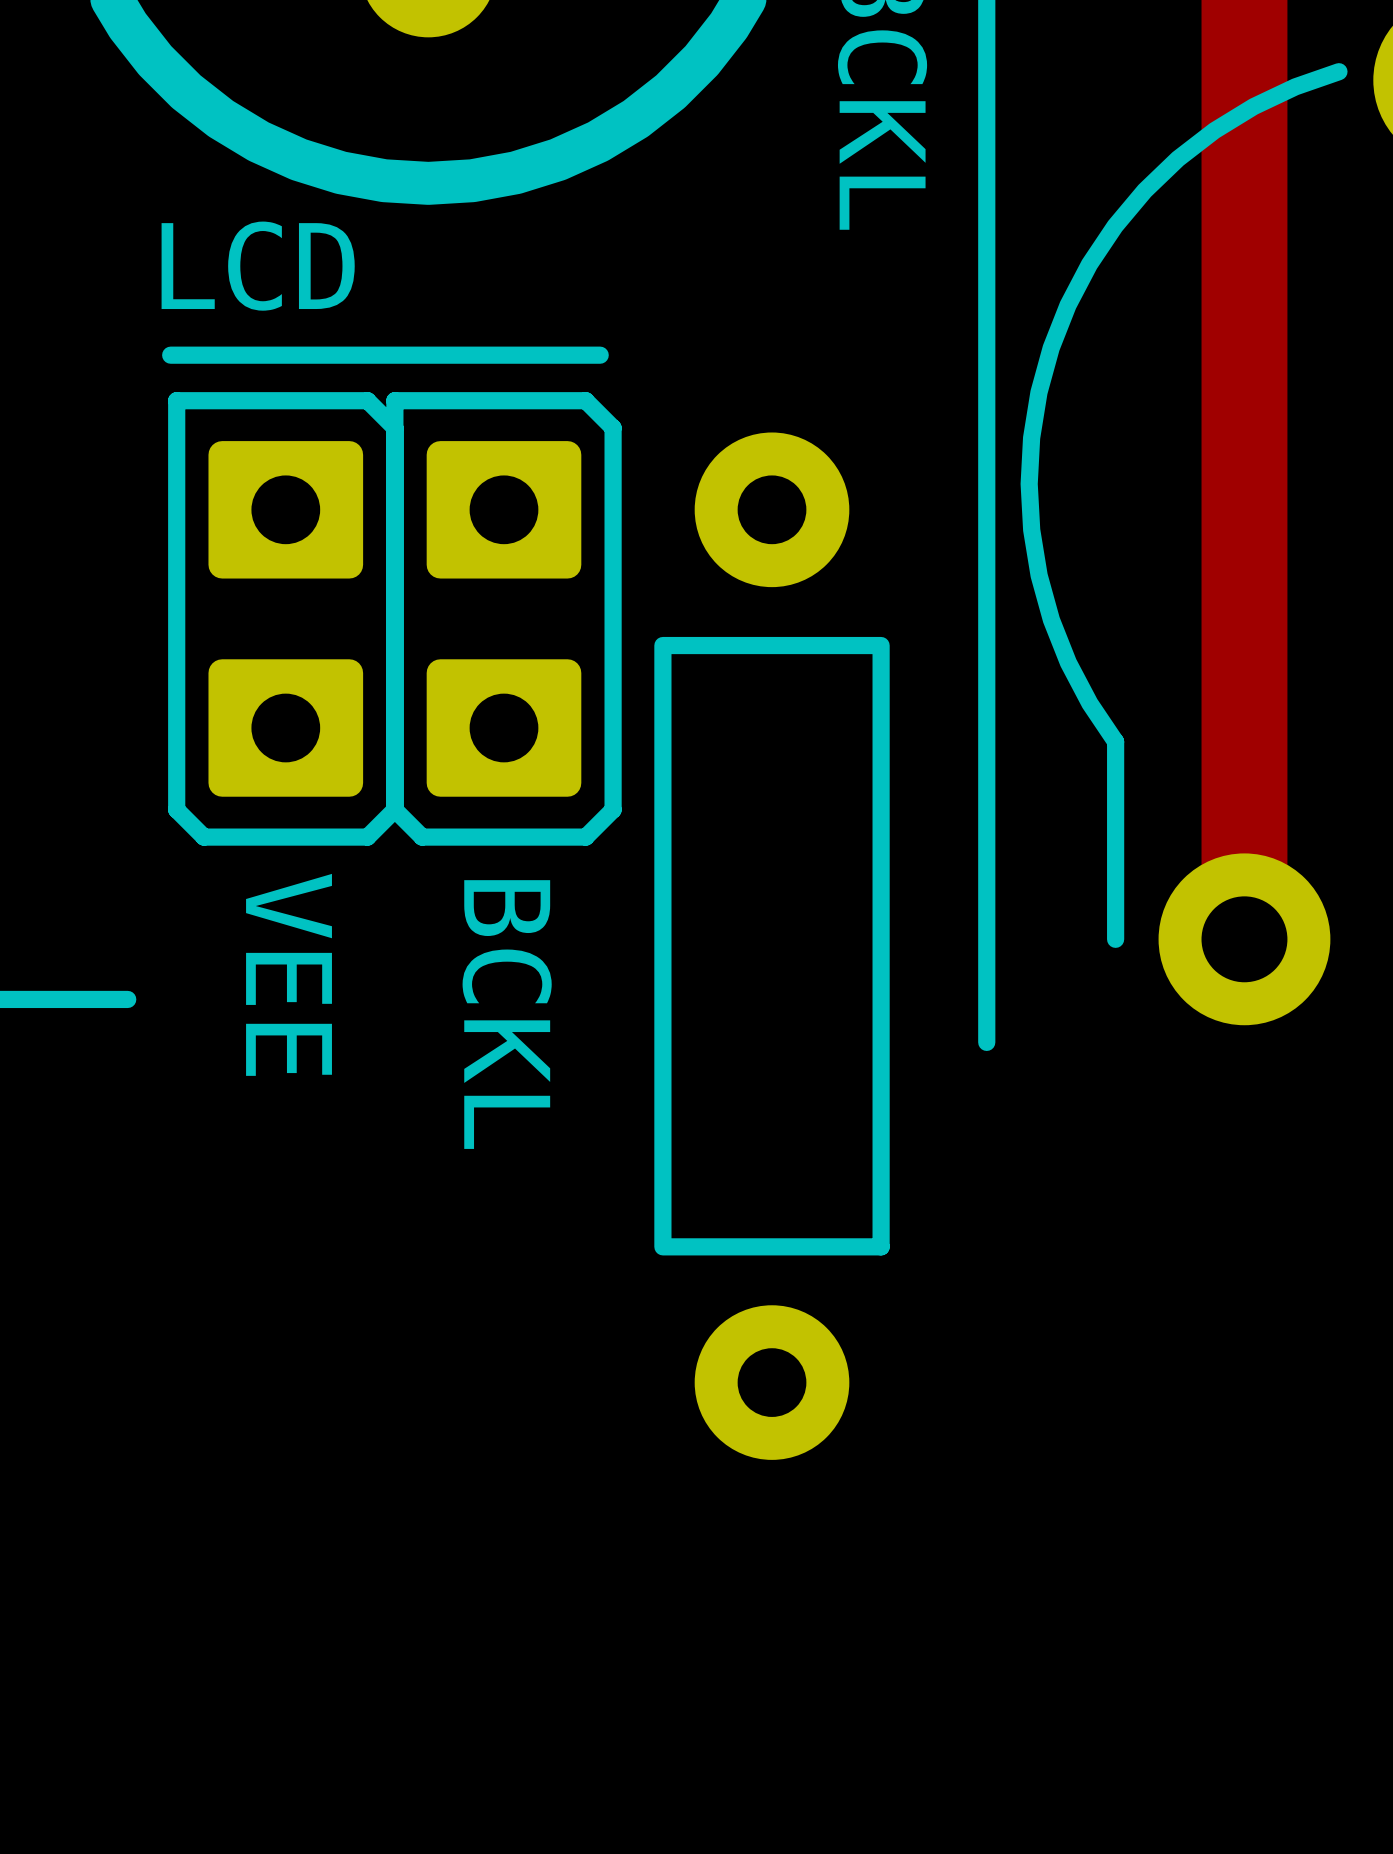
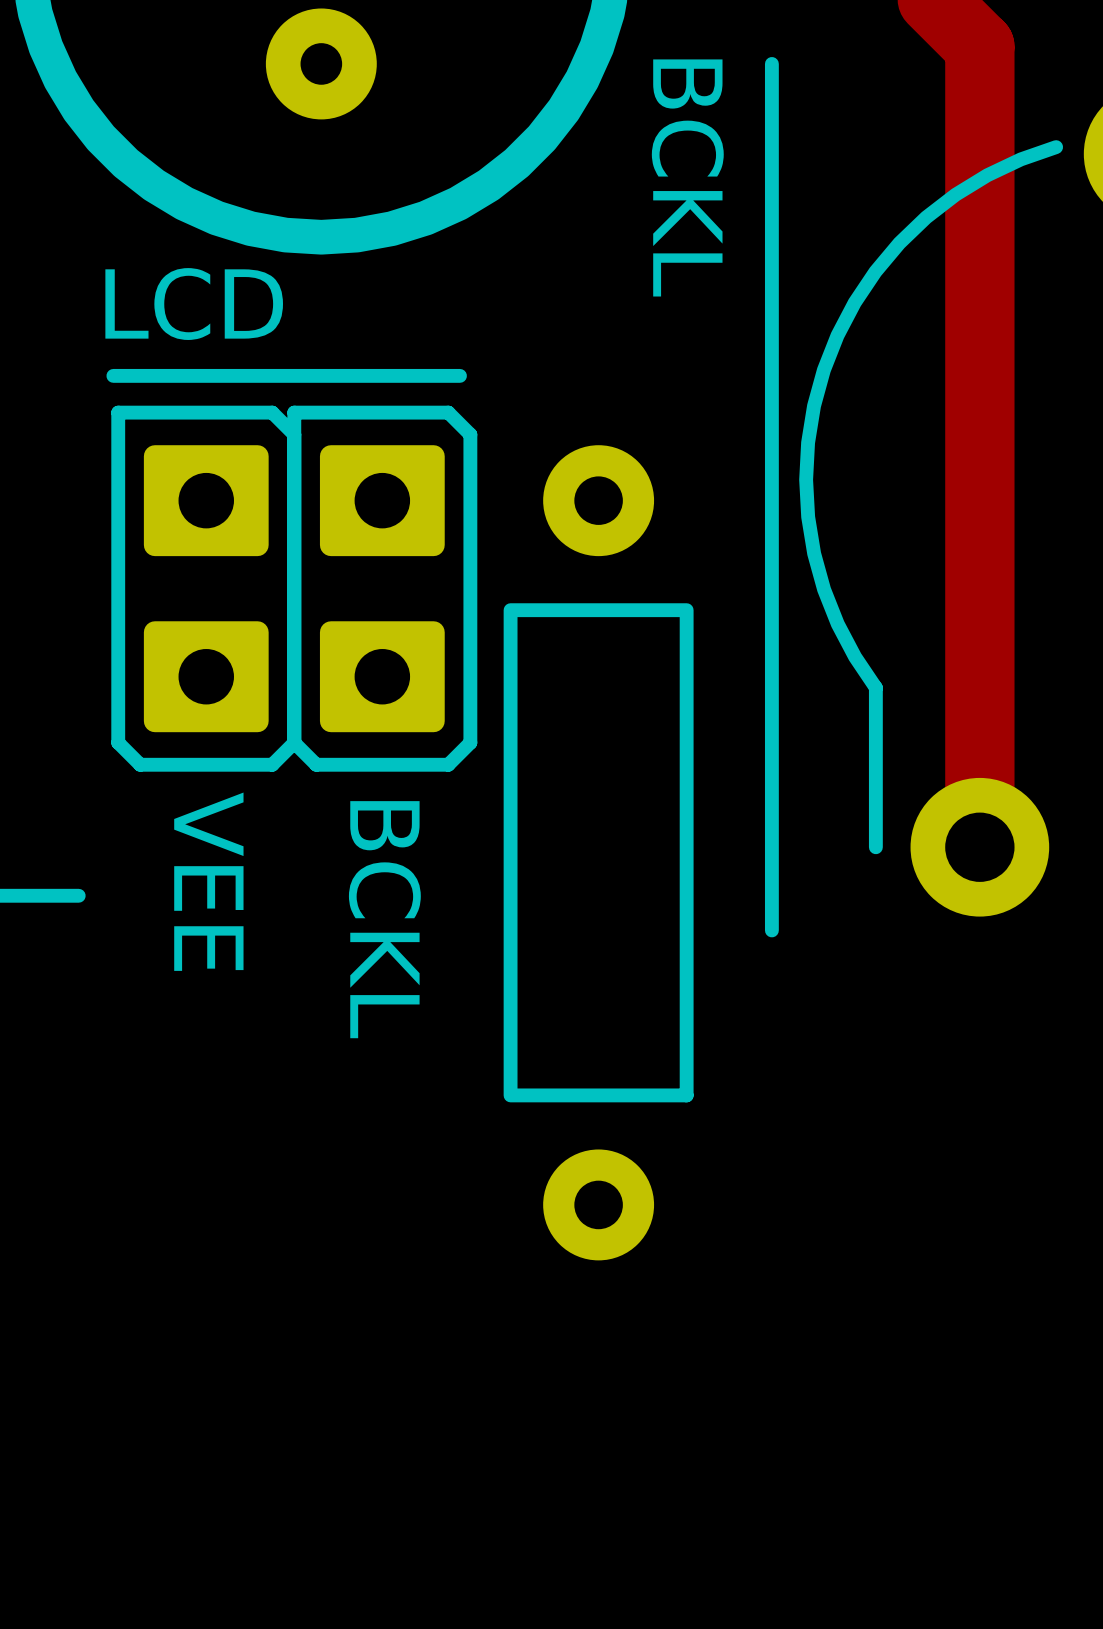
part footprint: [654, 432, 890, 1460] -> [503, 445, 694, 1261]

